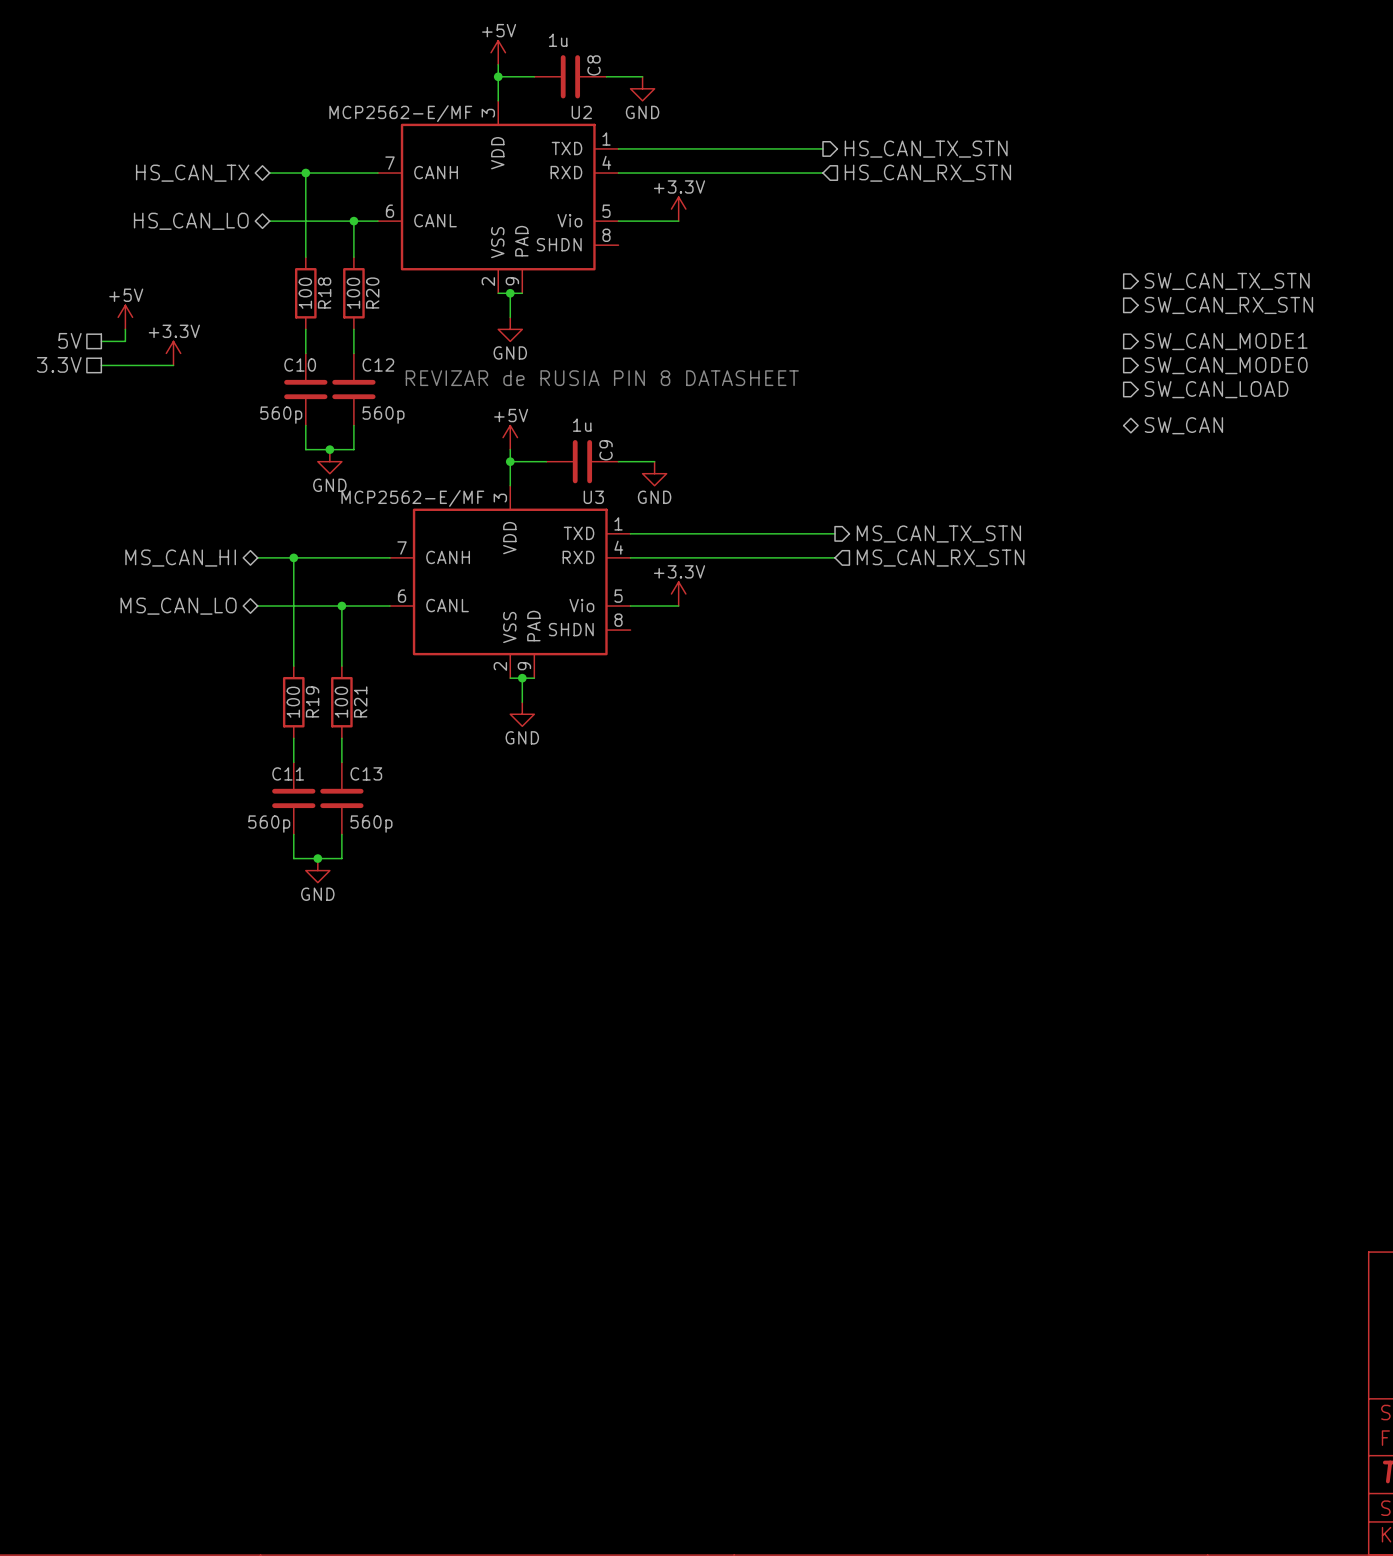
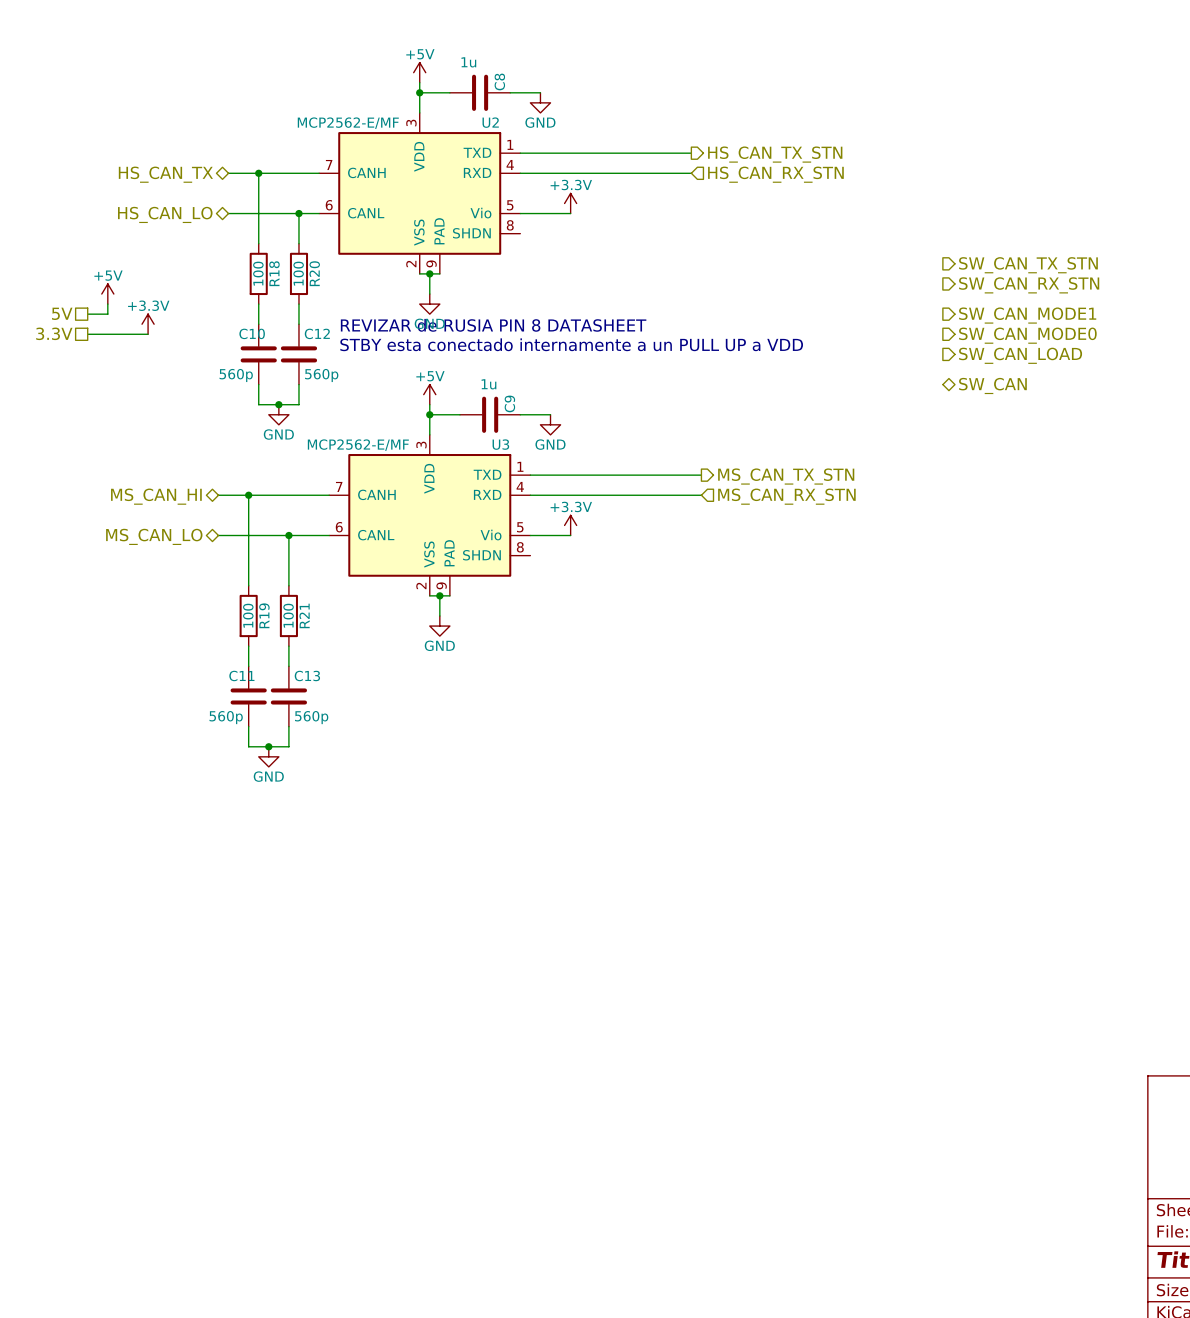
text: none -> REVIZAR de RUSIA PIN 8 DATASHEET (493, 325)
text: REVIZAR de RUSIA PIN 8 DATASHEET (602, 378) -> STBY esta conectado internamente a un PULL UP a VDD (571, 344)

